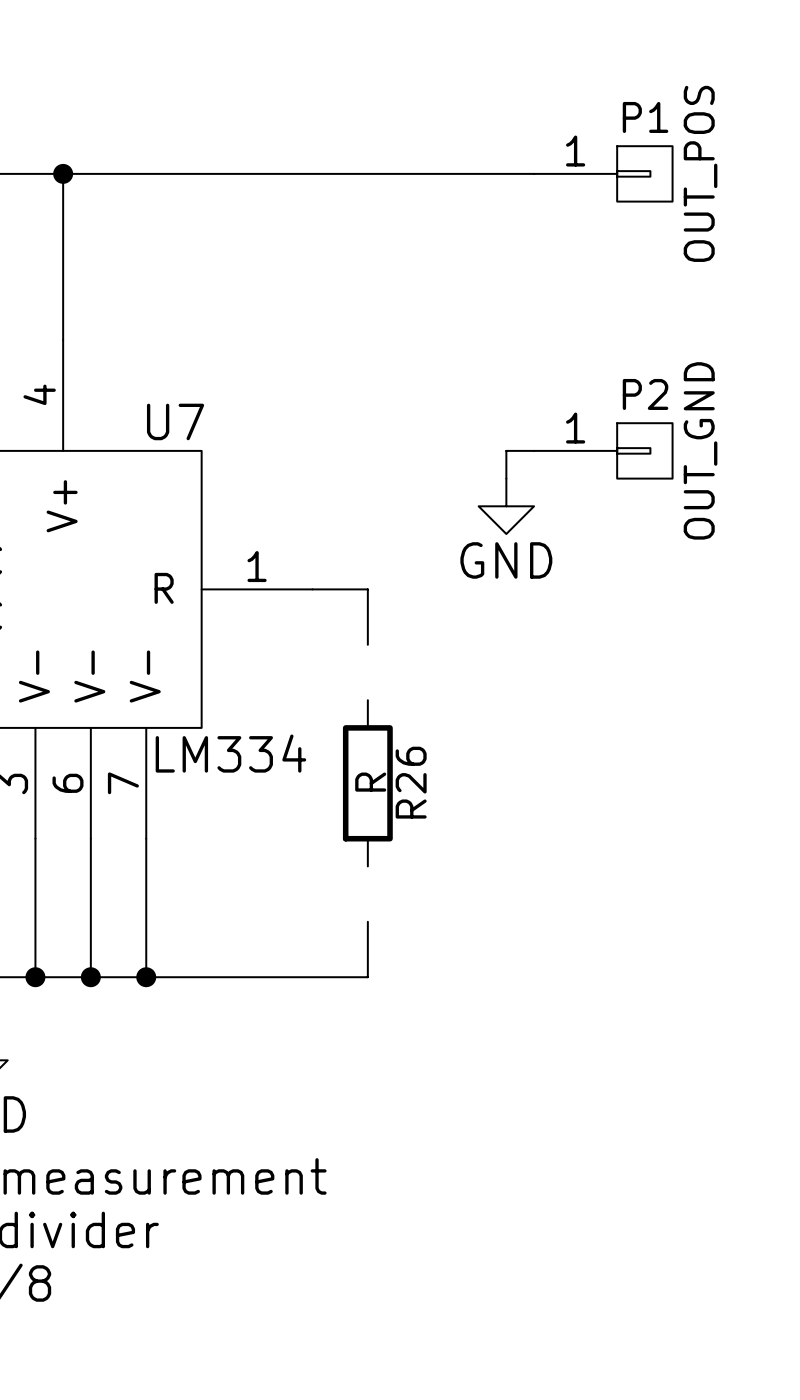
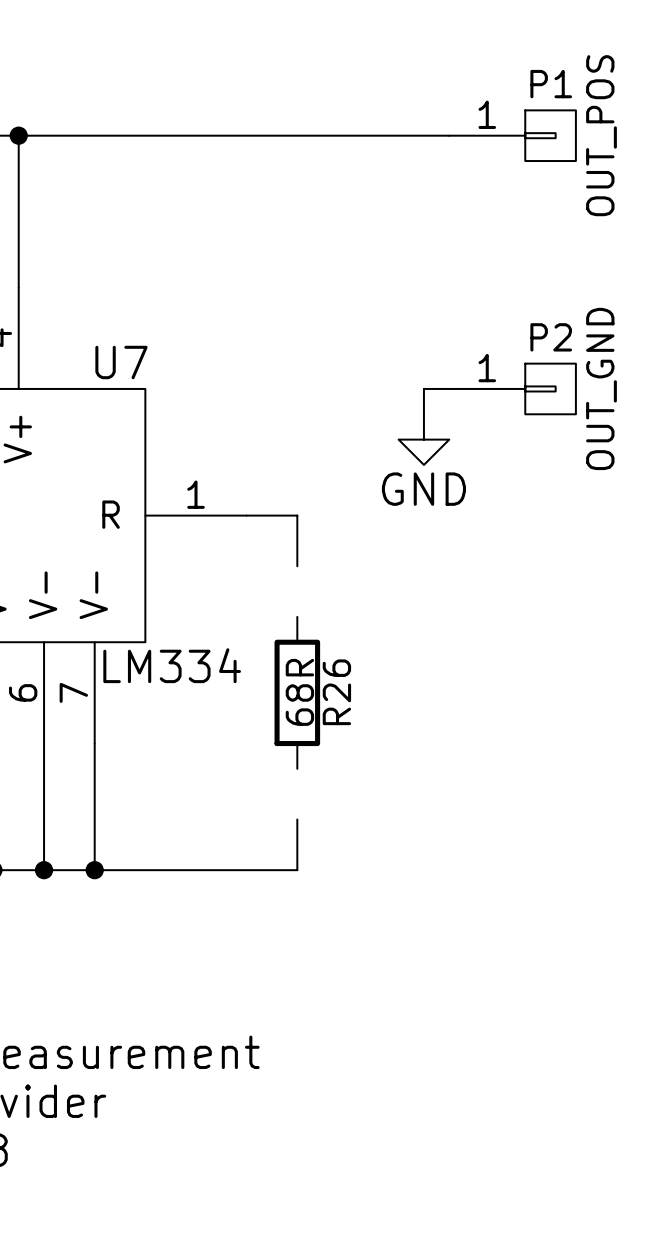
R26 value: R (370, 782) -> 68R (299, 692)

